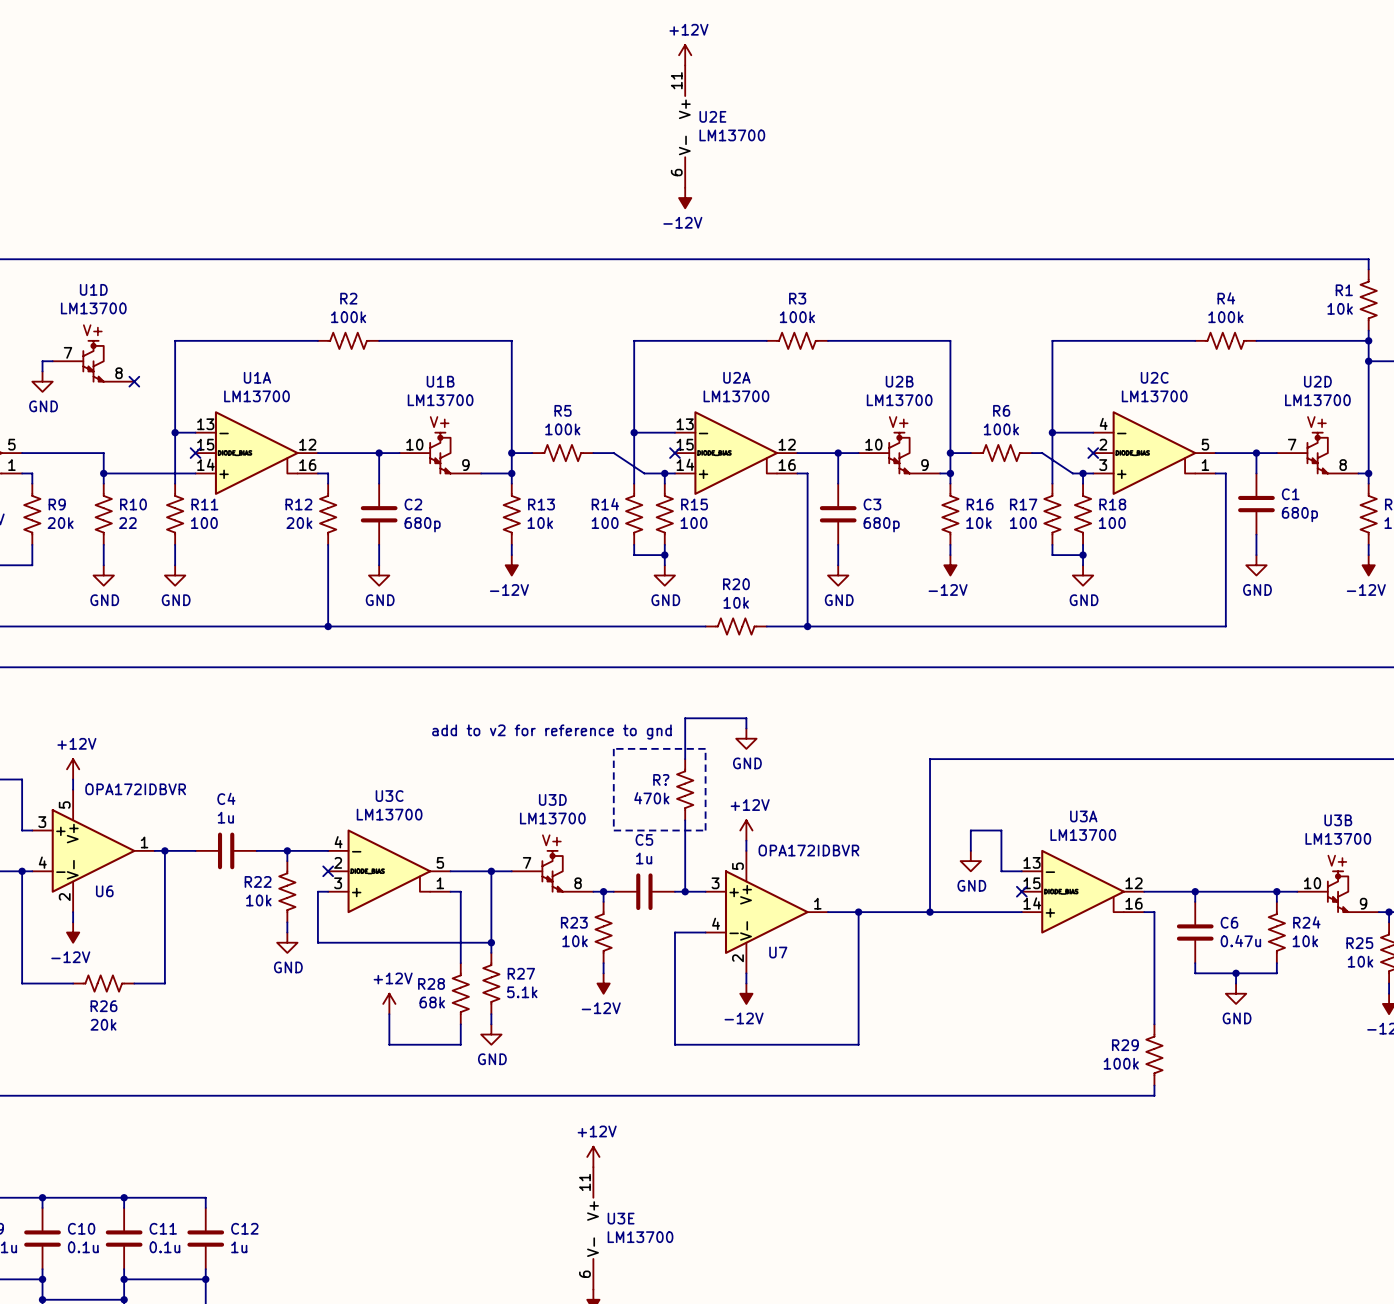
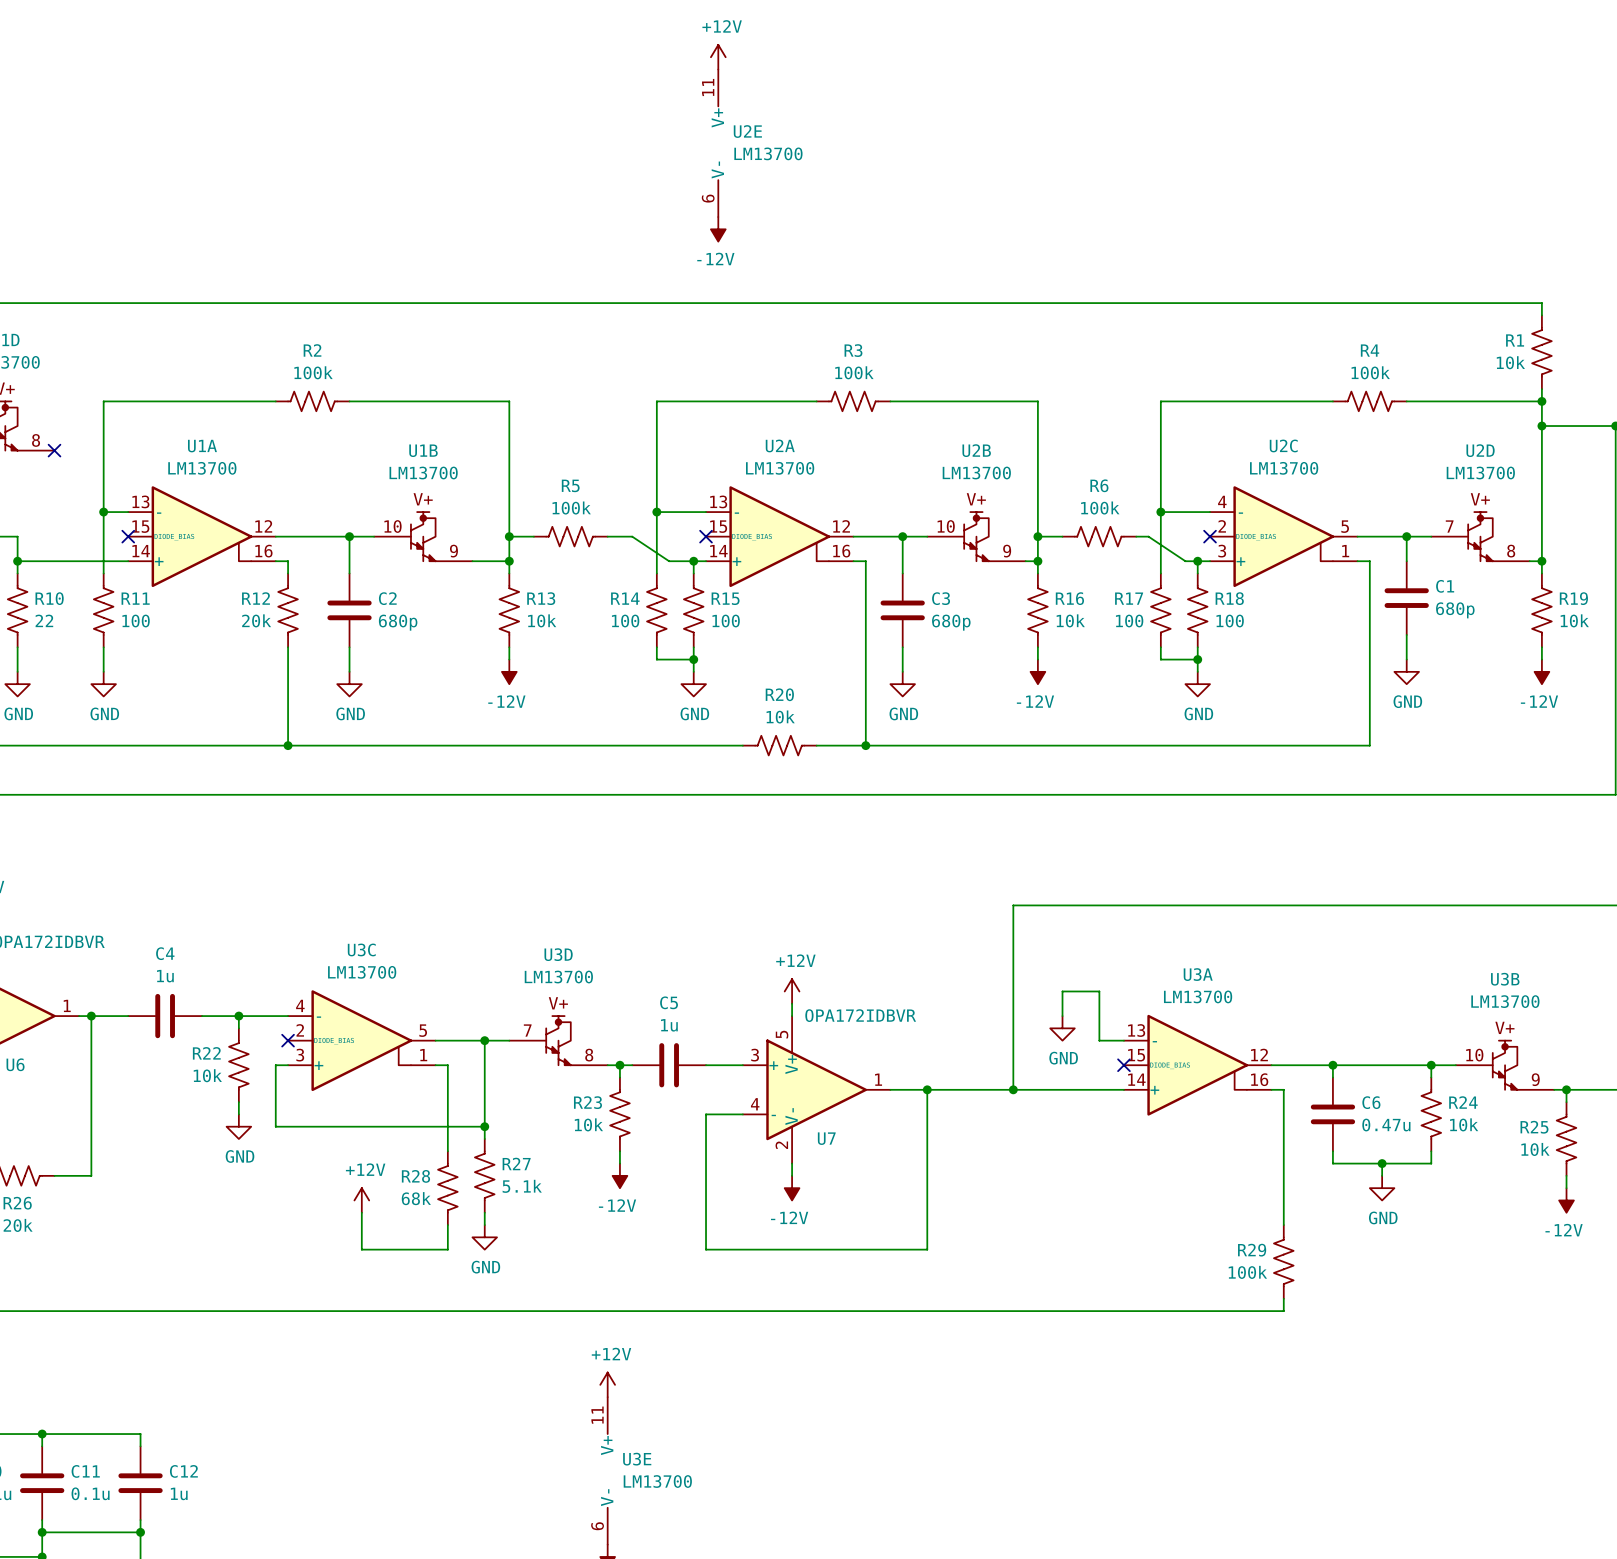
wire: (746, 728) (746, 718) (685, 718) (685, 759) -> none
text: add to v2 for reference to gnd (551, 732) -> none
power symbol: GND (746, 738) -> none
line: (613, 748) (705, 748) (705, 830) (613, 830) (613, 748) -> none
R?: 470k (685, 789) -> none
wire: (685, 820) (685, 891) -> none
junction: (685, 891) -> none

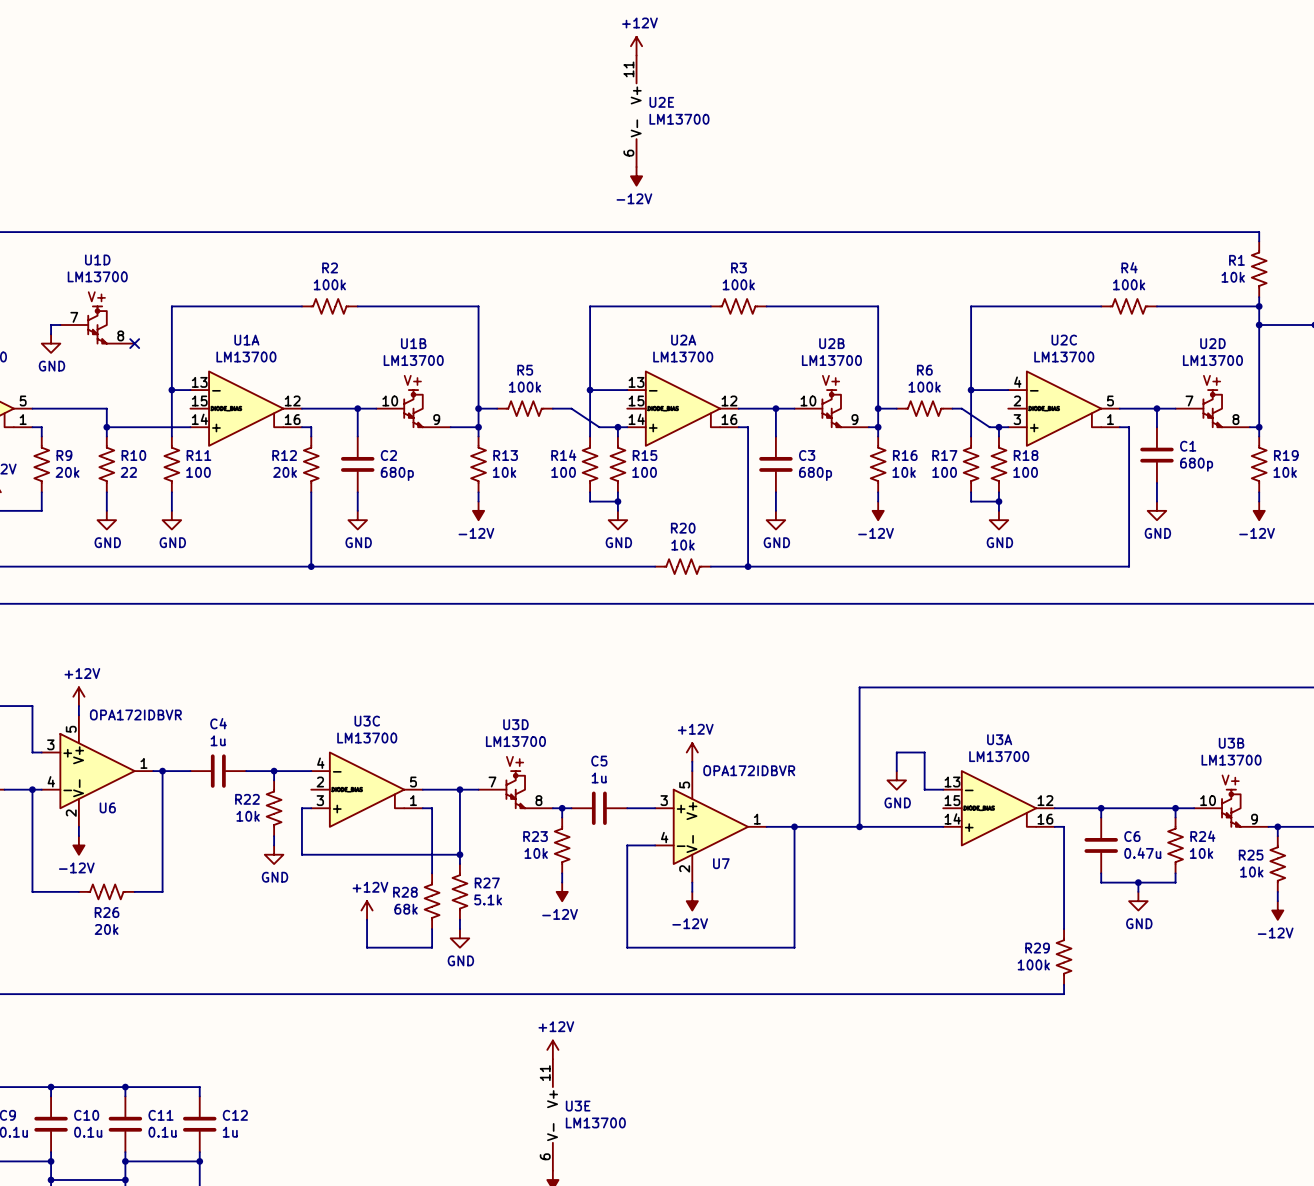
no-connect mark: (128, 536) -> none
no-connect mark: (706, 536) -> none
no-connect mark: (1210, 536) -> none
no-connect mark: (288, 1040) -> none
no-connect mark: (1123, 1065) -> none

